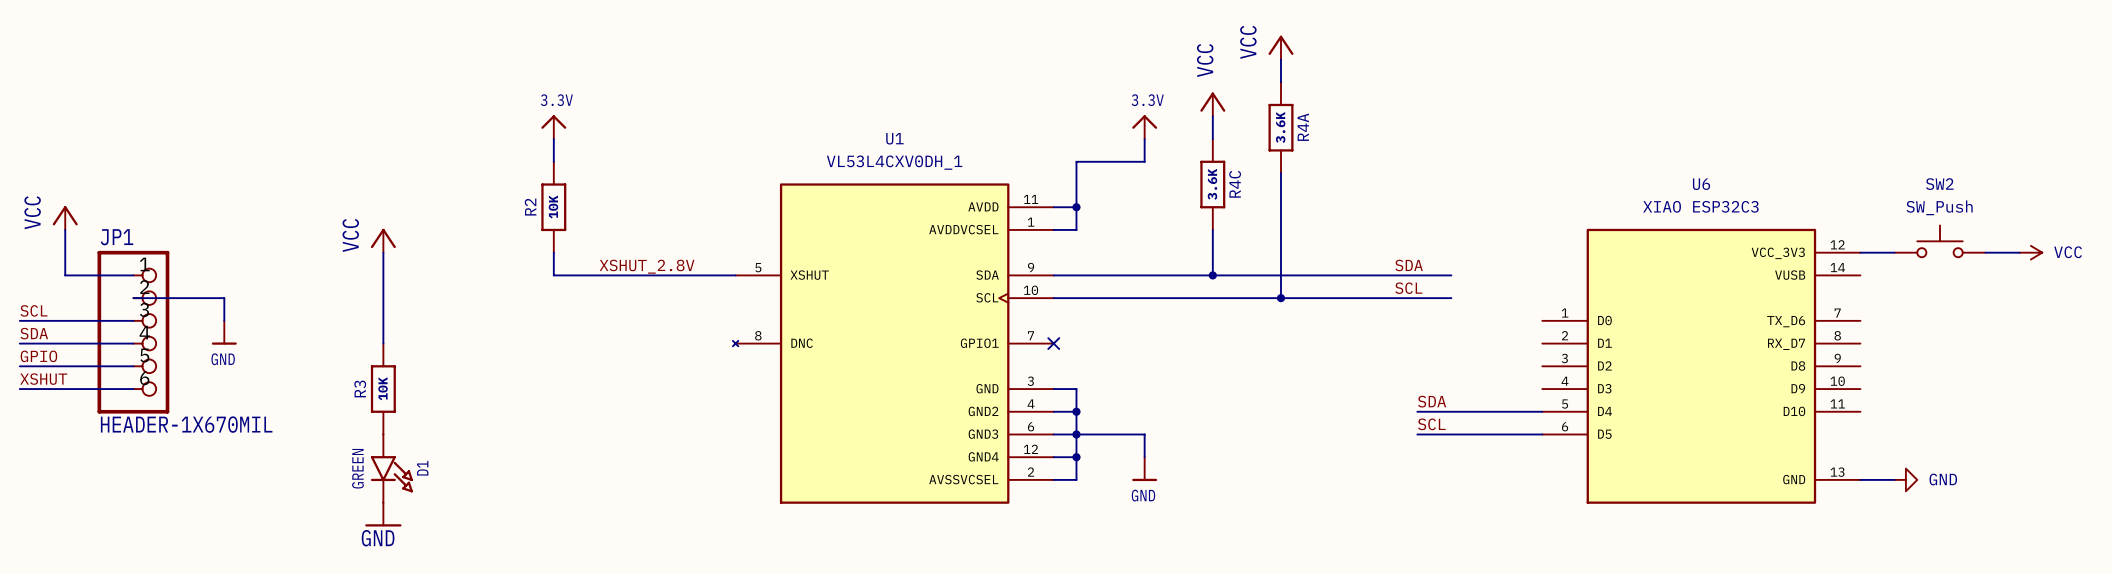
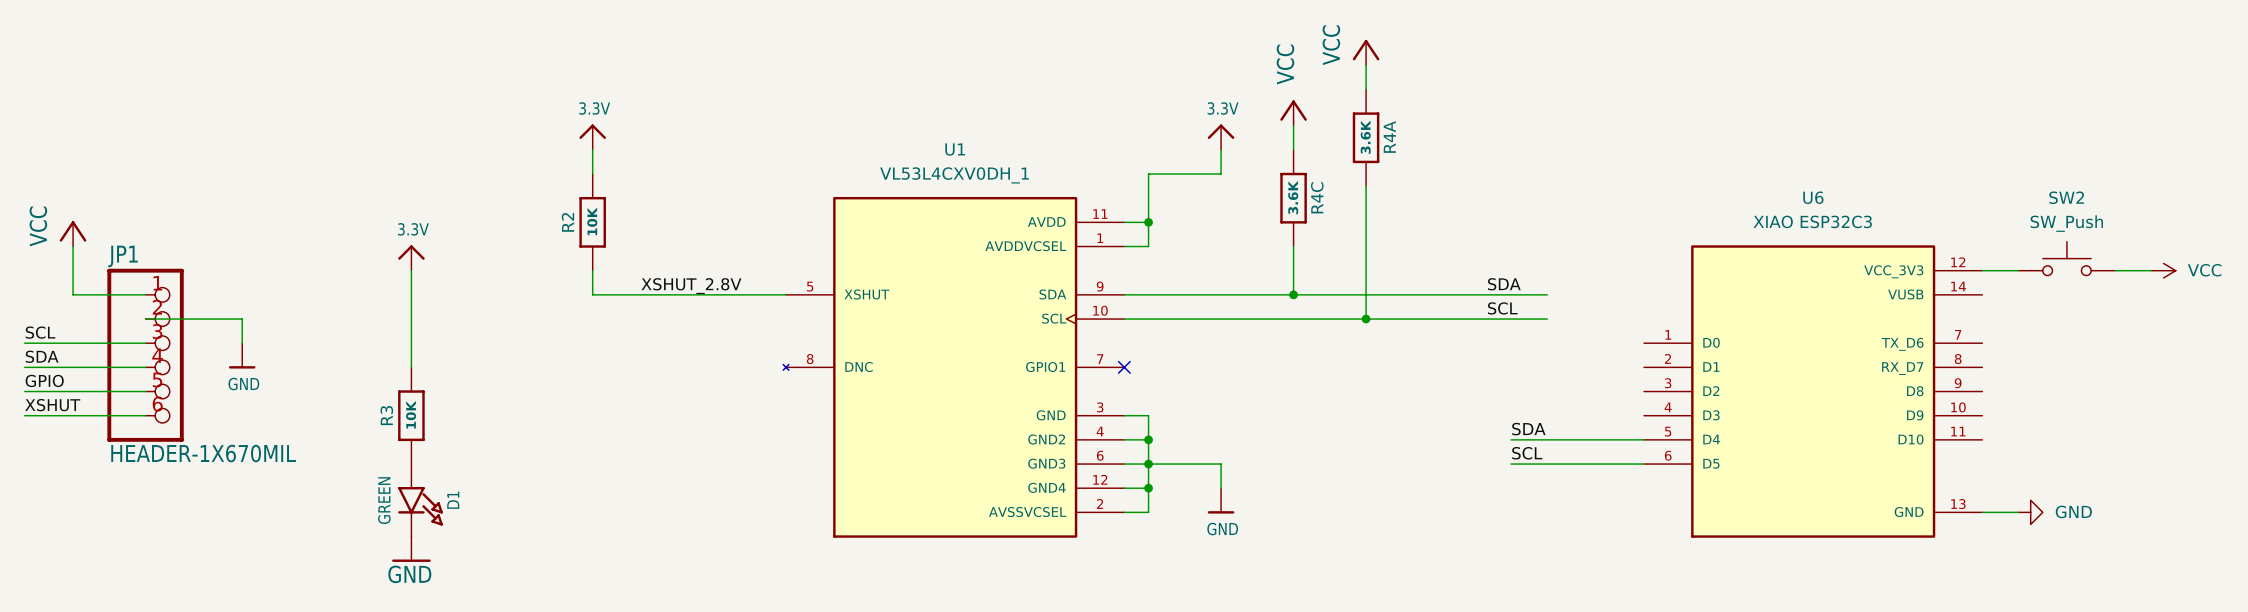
power symbol: VCC (383, 240) -> 3.3V (411, 258)

